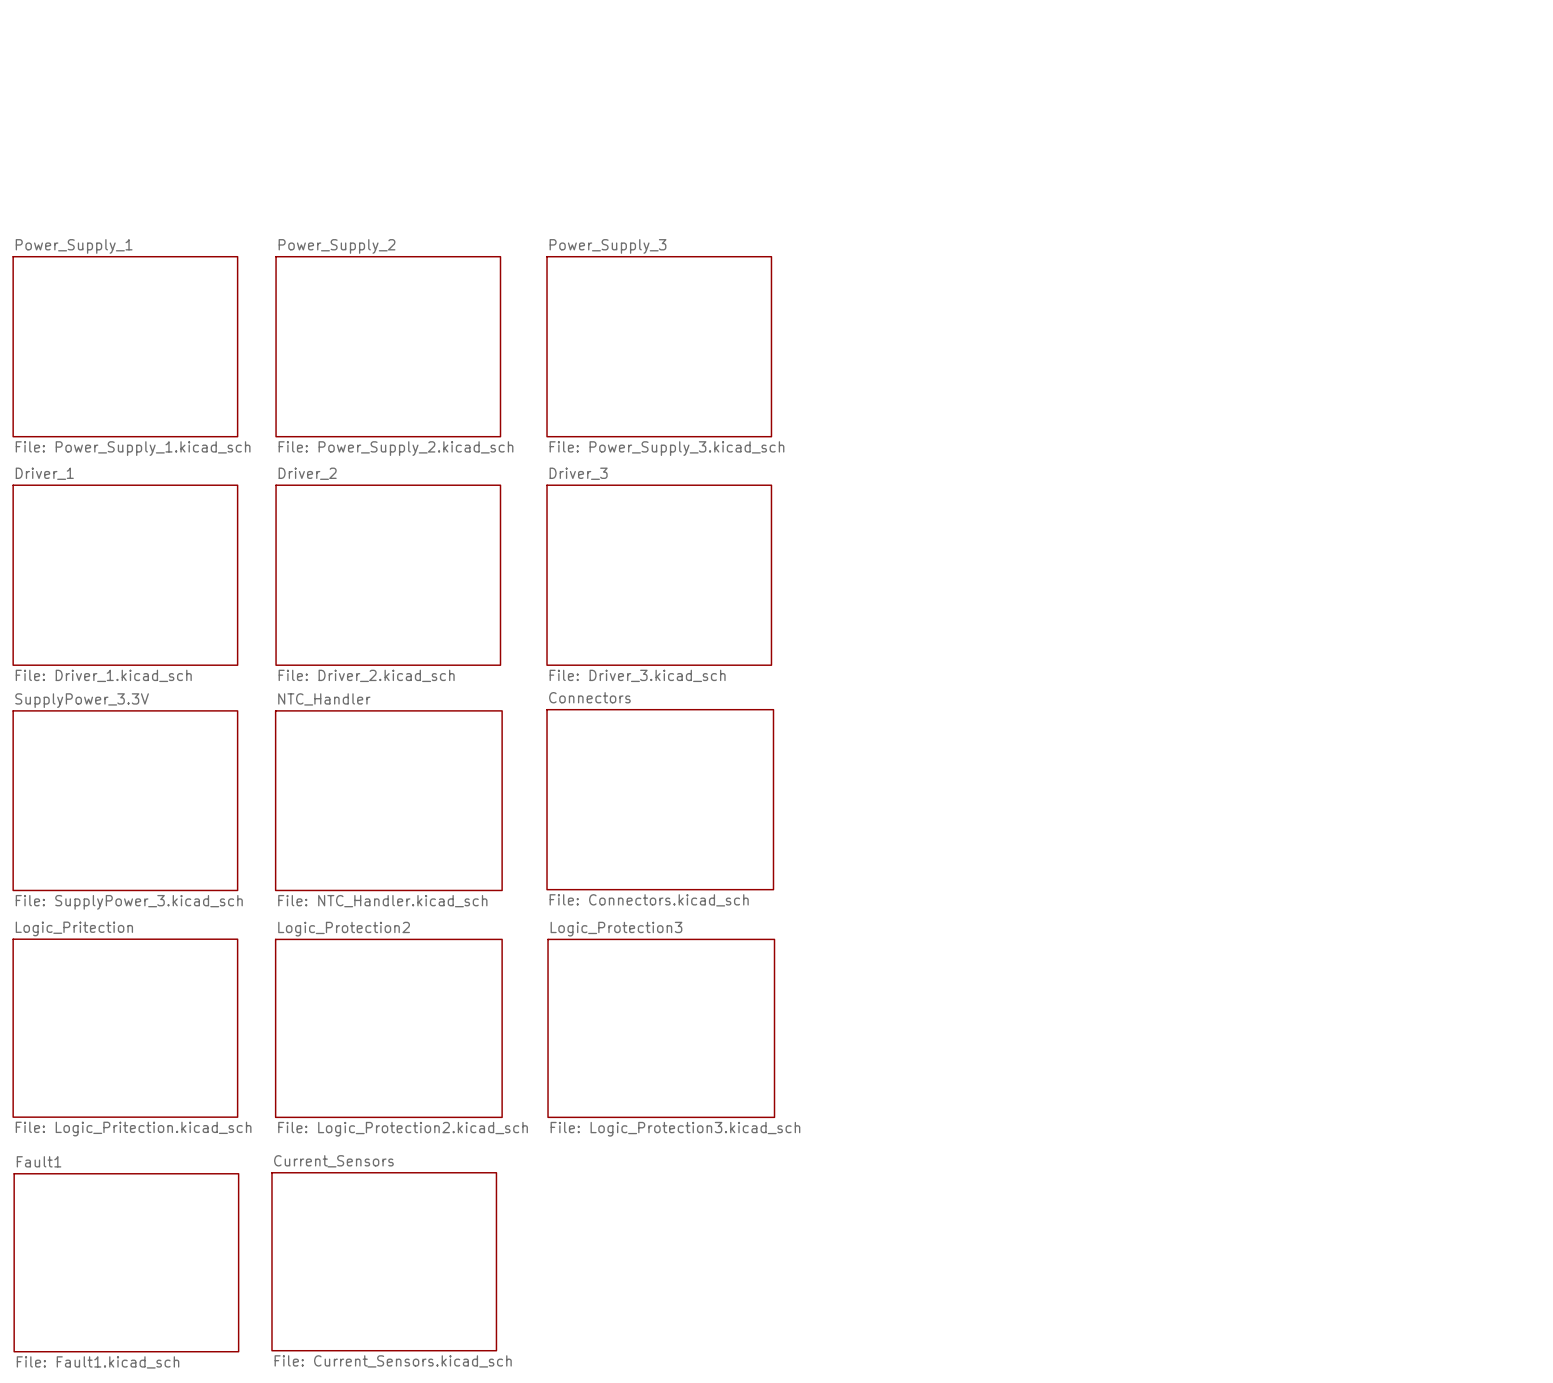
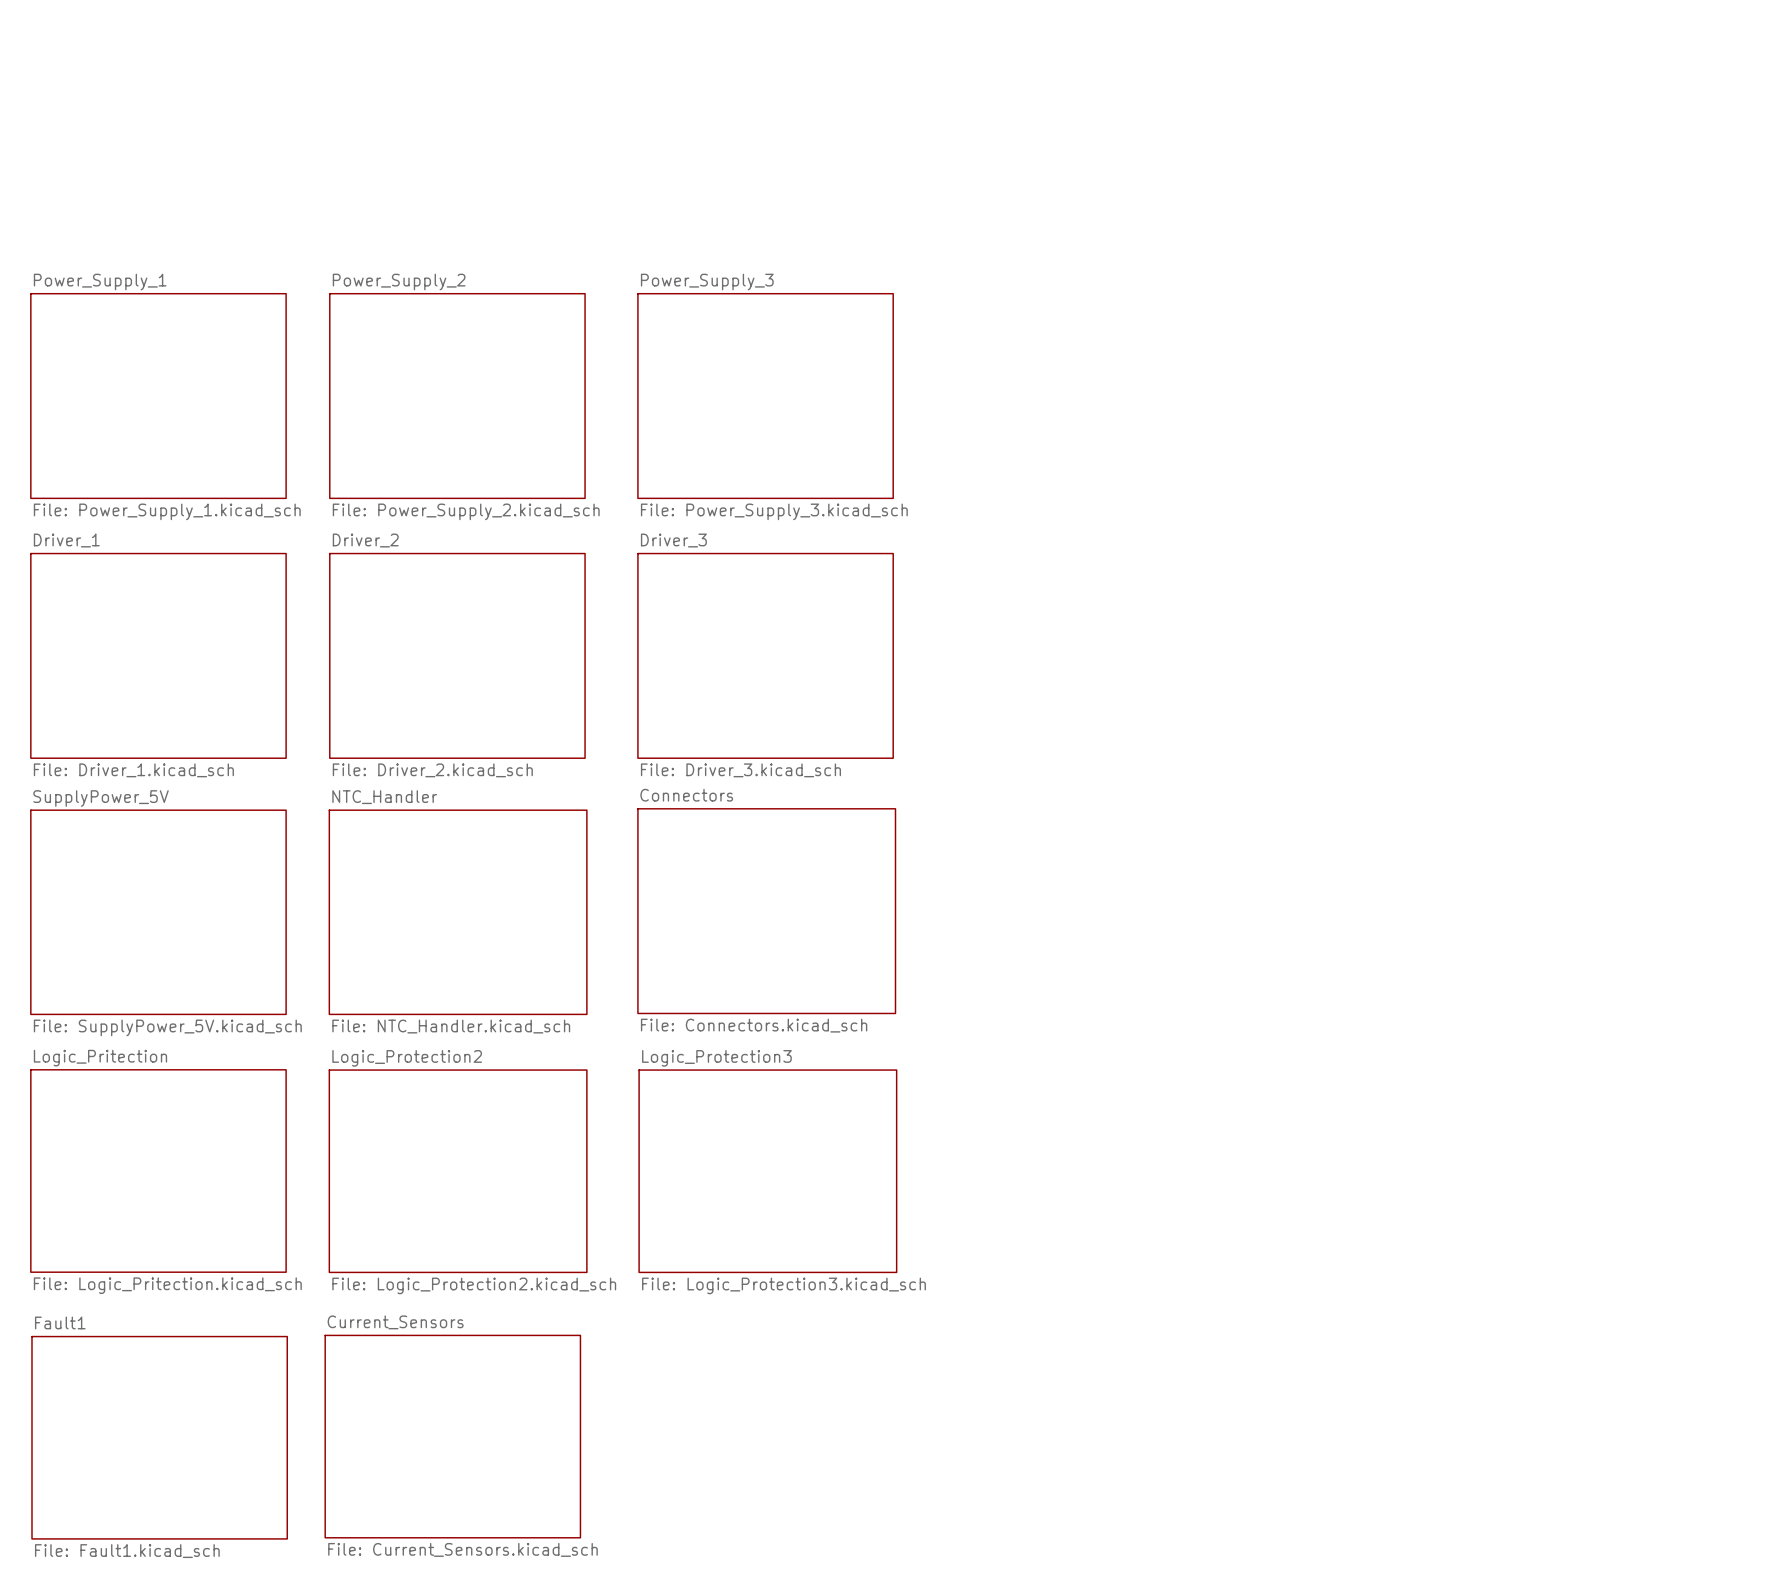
sheet SupplyPower_3.3V name: SupplyPower_3.3V (82, 700) -> SupplyPower_5V (101, 798)
sheet SupplyPower_3.3V value: File: SupplyPower_3.kicad_sch (129, 902) -> File: SupplyPower_5V.kicad_sch (167, 1027)

